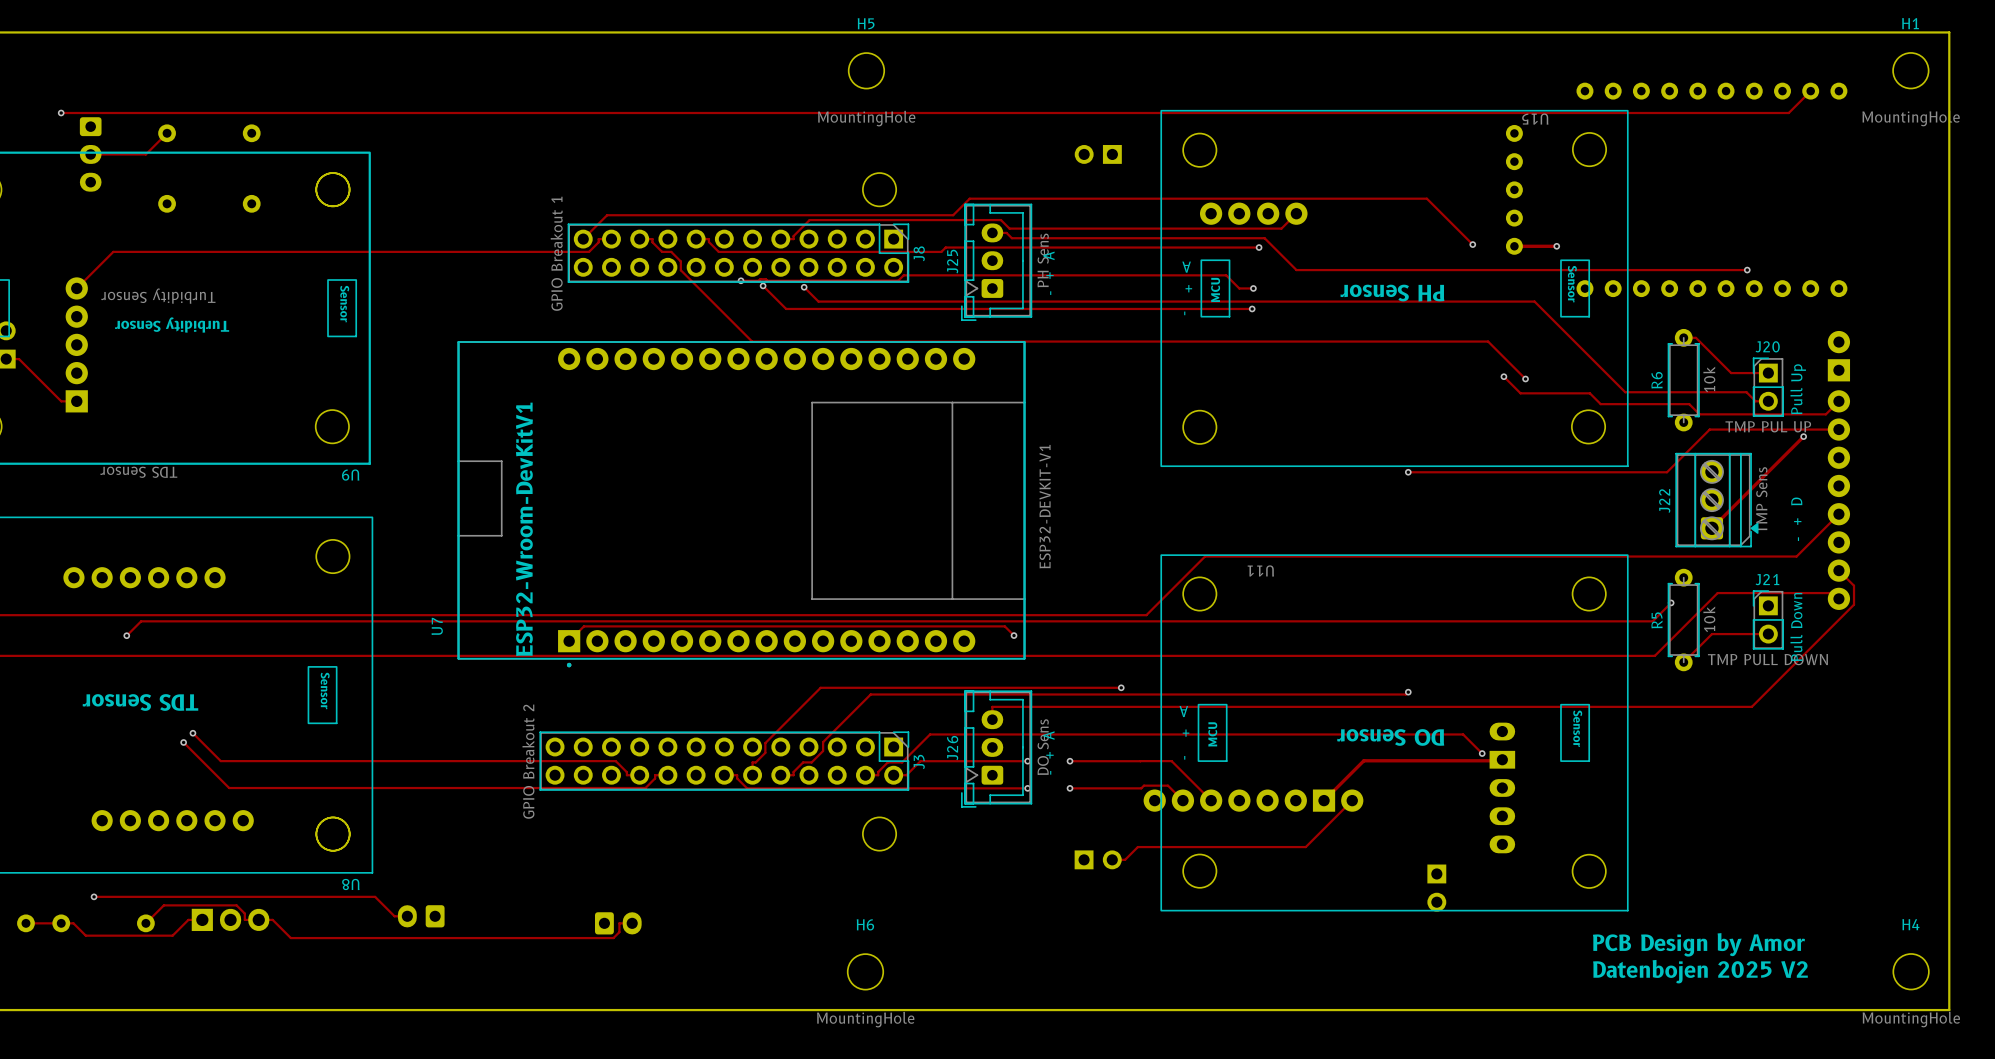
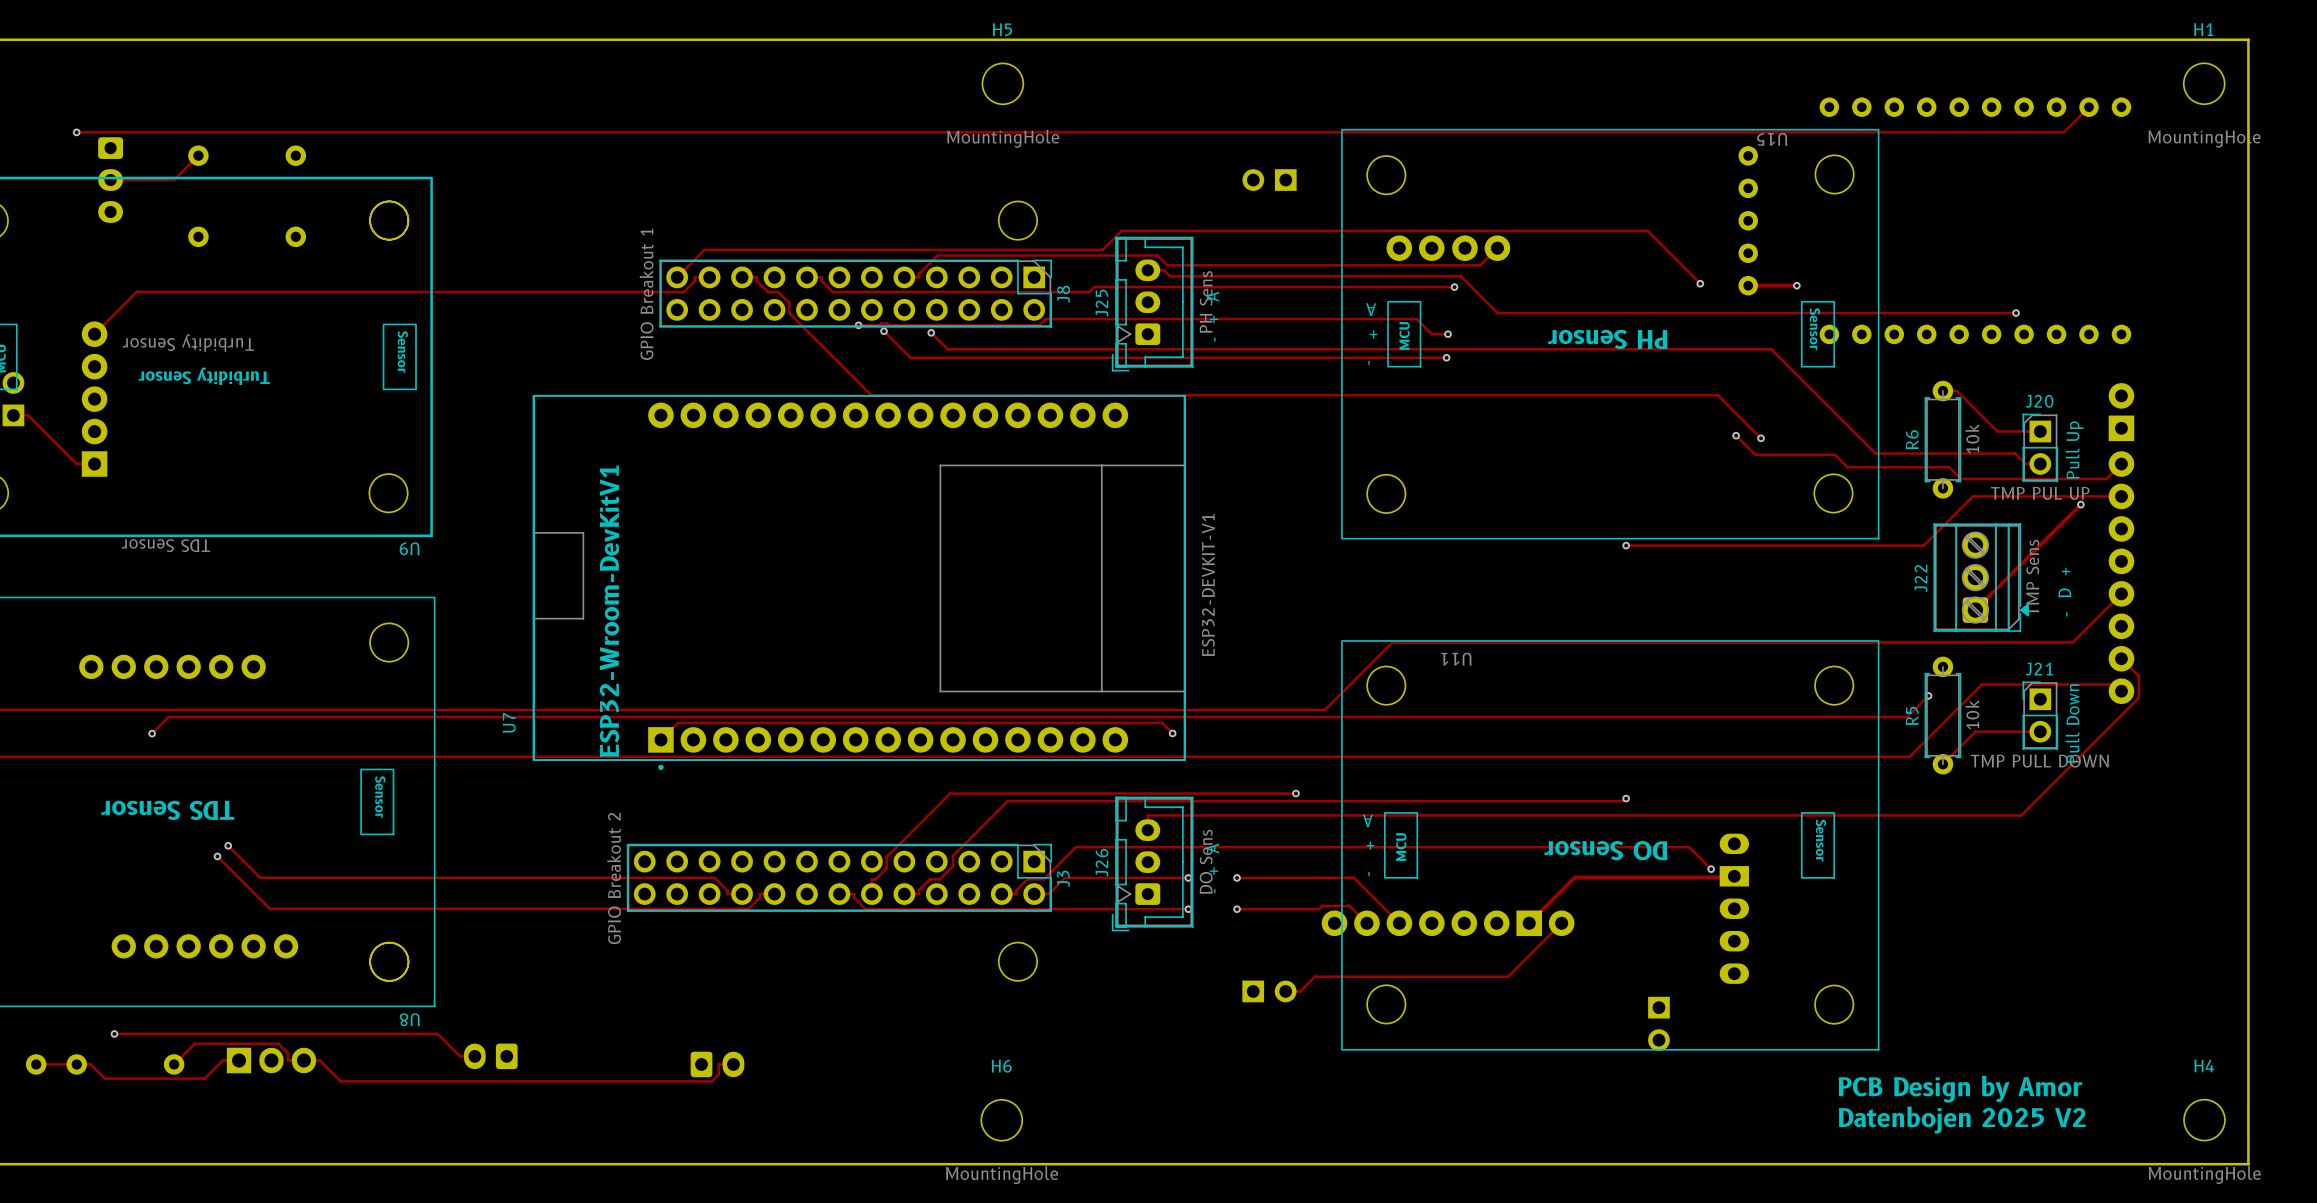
text: - + D (1796, 519) -> - D + (2064, 592)

